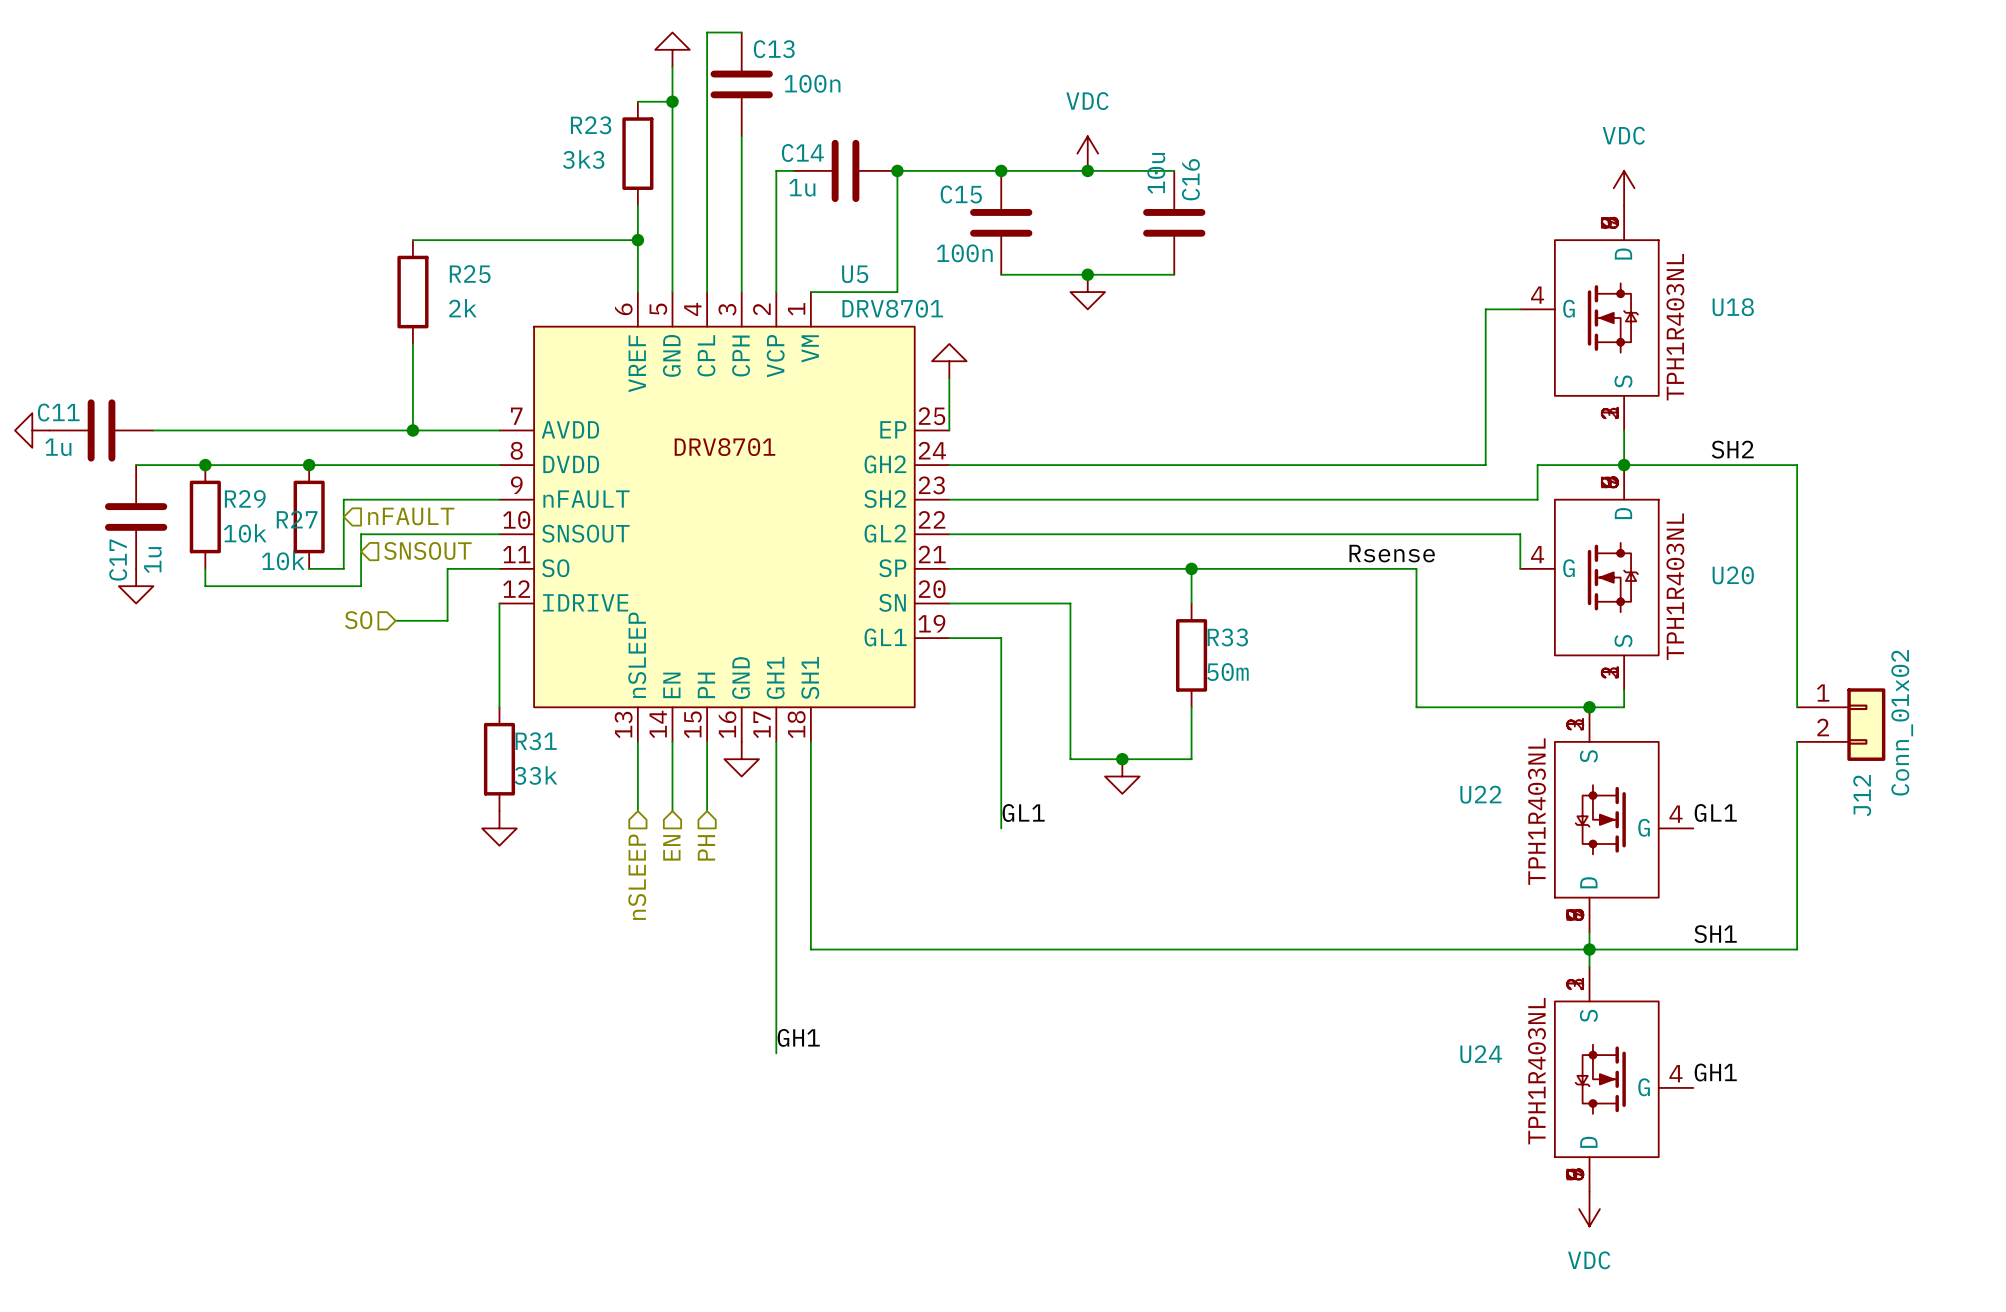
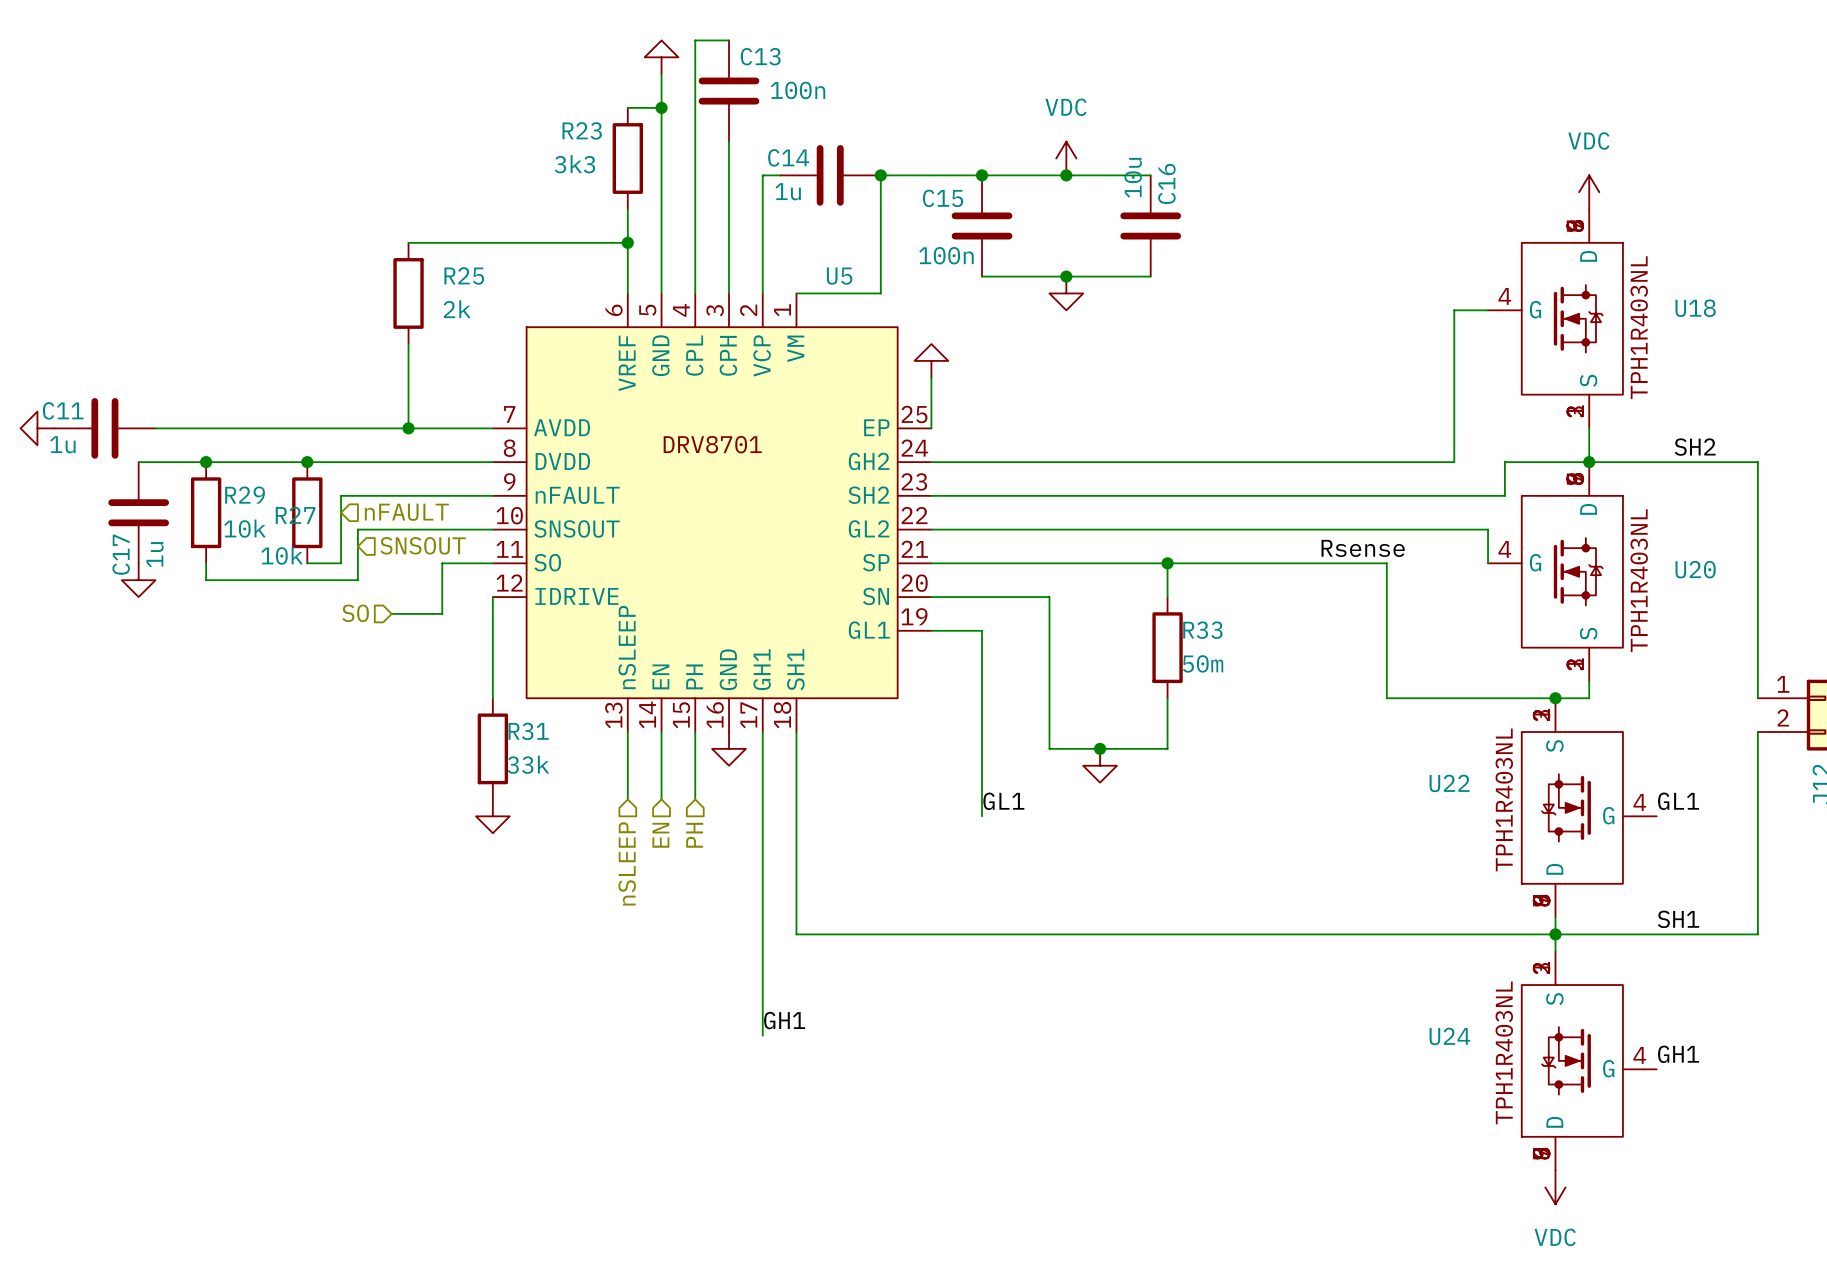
U5 value: DRV8701 (892, 308) -> none

